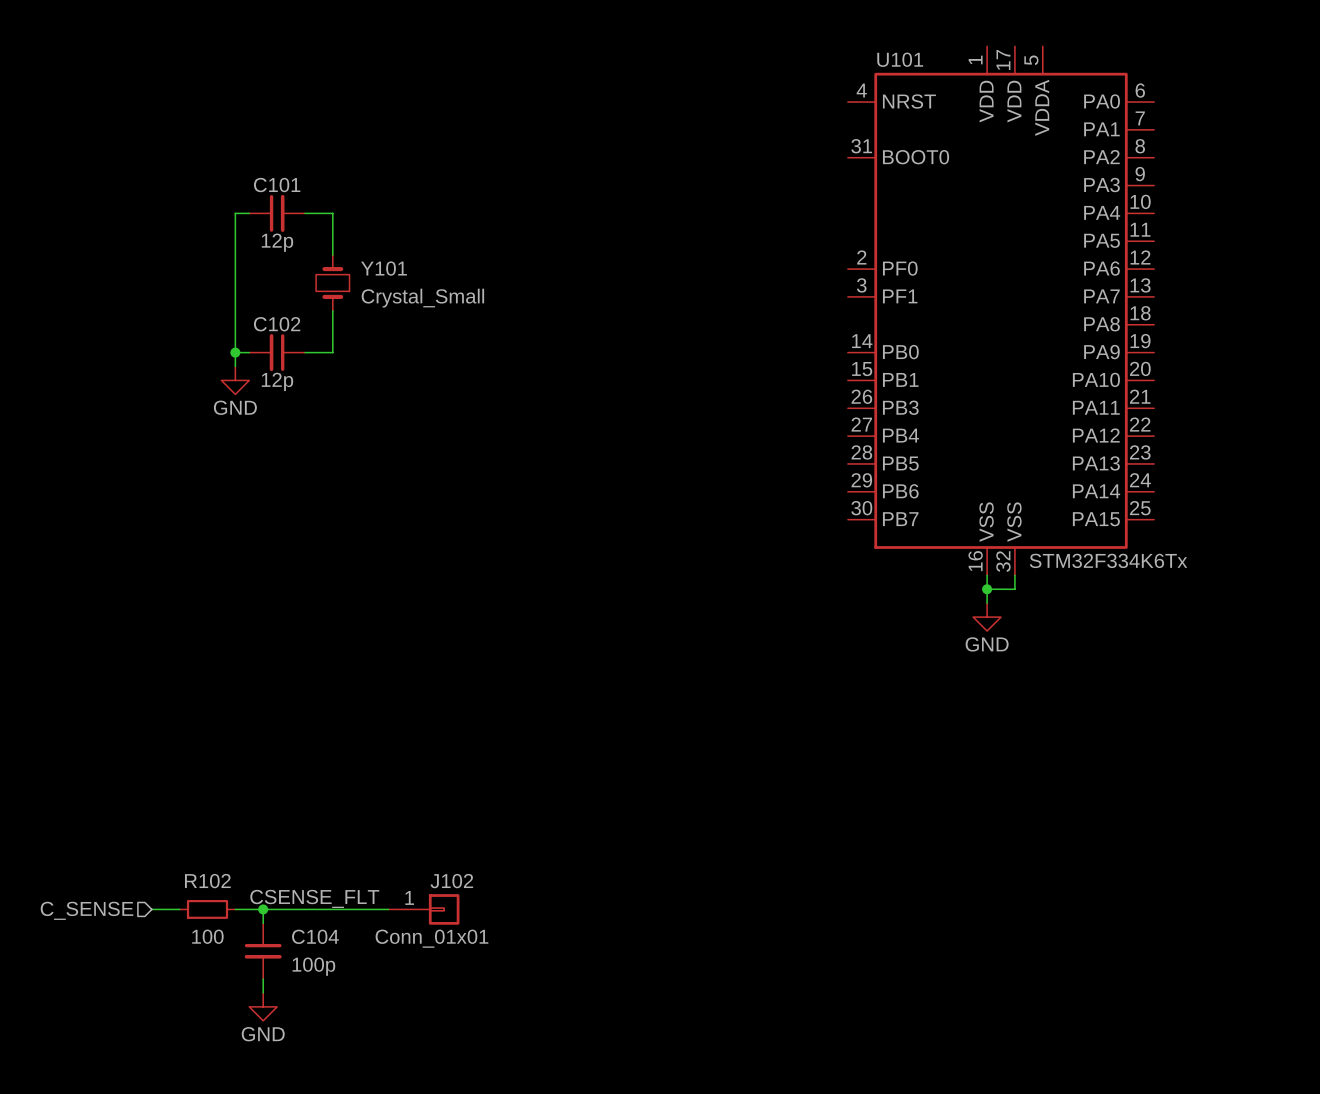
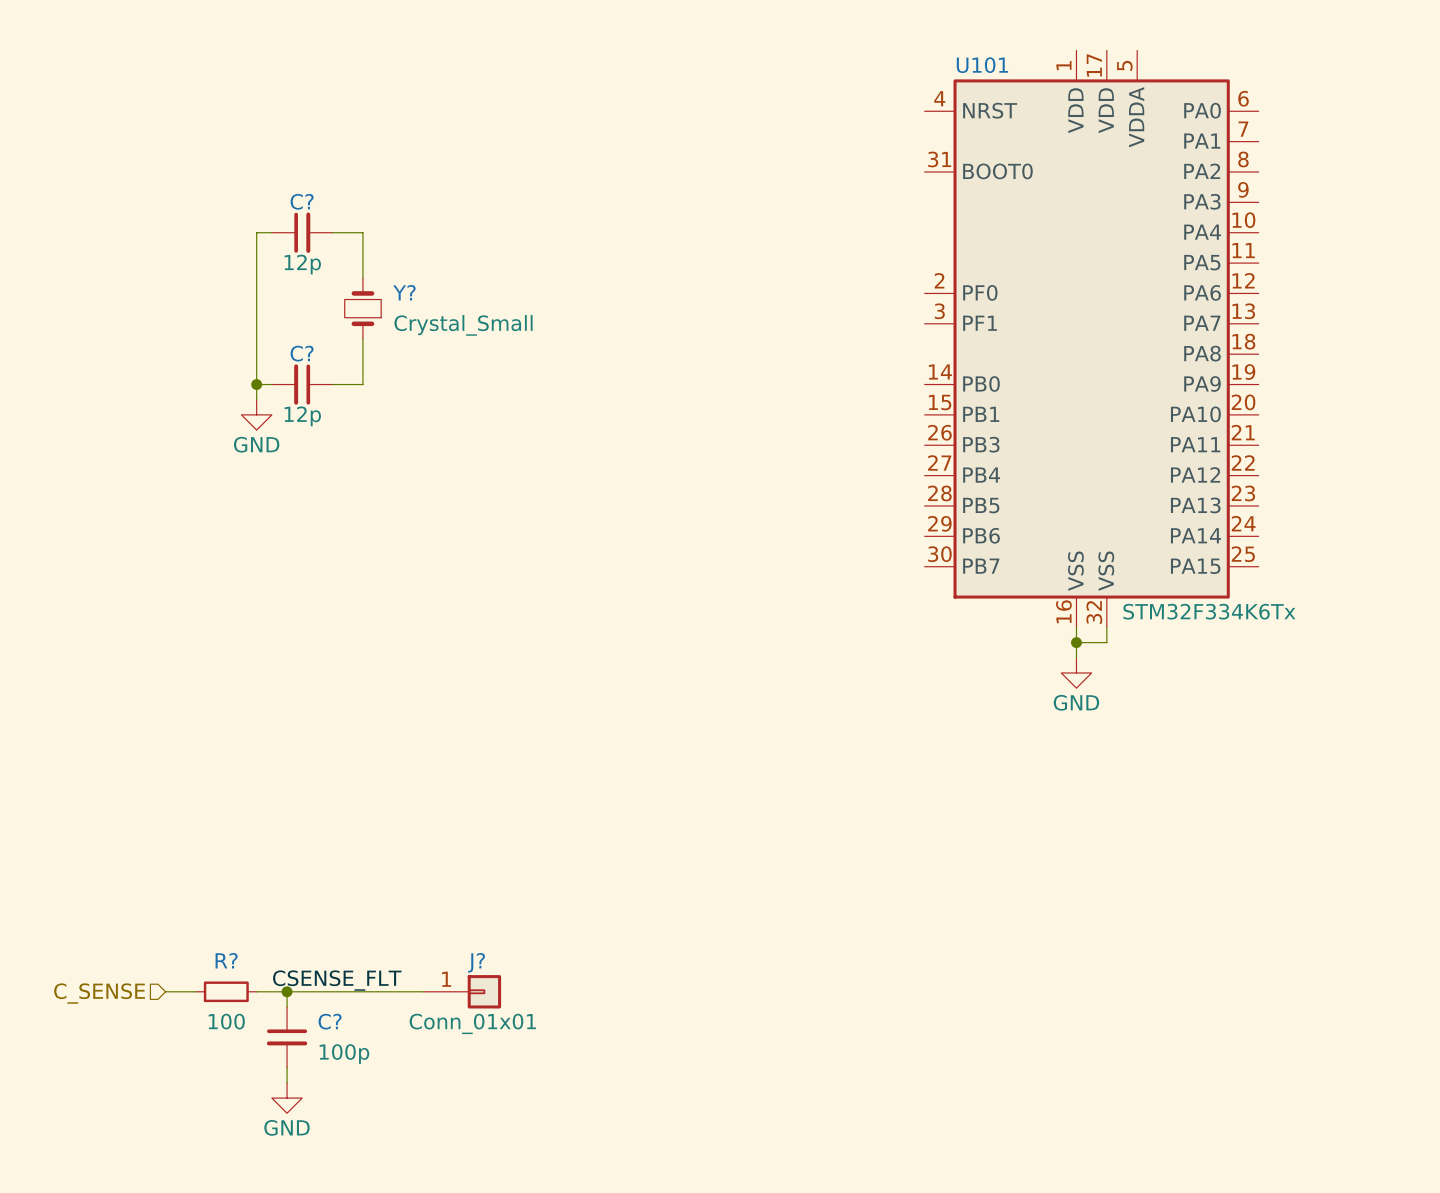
C101 name: C101 (277, 185) -> C? (302, 201)
Y101 name: Y101 (384, 268) -> Y? (404, 292)
C102 name: C102 (277, 324) -> C? (302, 353)
R102 name: R102 (207, 881) -> R? (226, 960)
J102 name: J102 (451, 881) -> J? (476, 962)
C104 name: C104 (315, 936) -> C? (330, 1021)

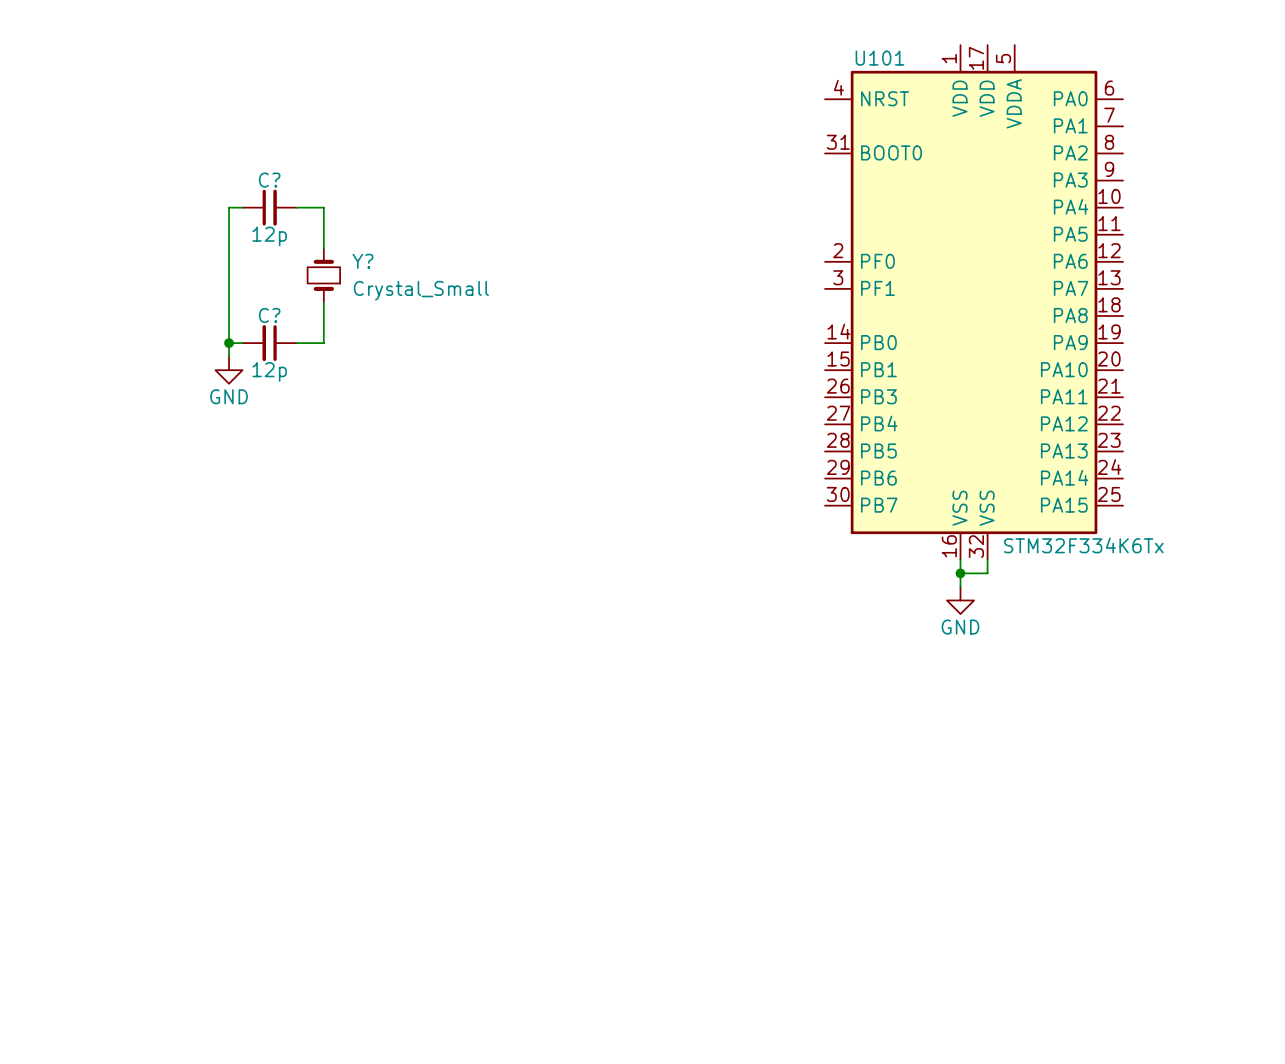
label: CSENSE_FLT (337, 980) -> none
wire: (165, 991) (195, 991) -> none
R?: 100 (226, 991) -> none
wire: (256, 991) (423, 991) -> none
wire: (287, 991) (287, 1006) -> none
junction: (287, 991) -> none
J?: Conn_01x01 (462, 991) -> none
hierarchical label: C_SENSE (99, 993) -> none
C?: 100p (287, 1037) -> none
wire: (287, 1067) (287, 1082) -> none
power symbol: GND (287, 1098) -> none

